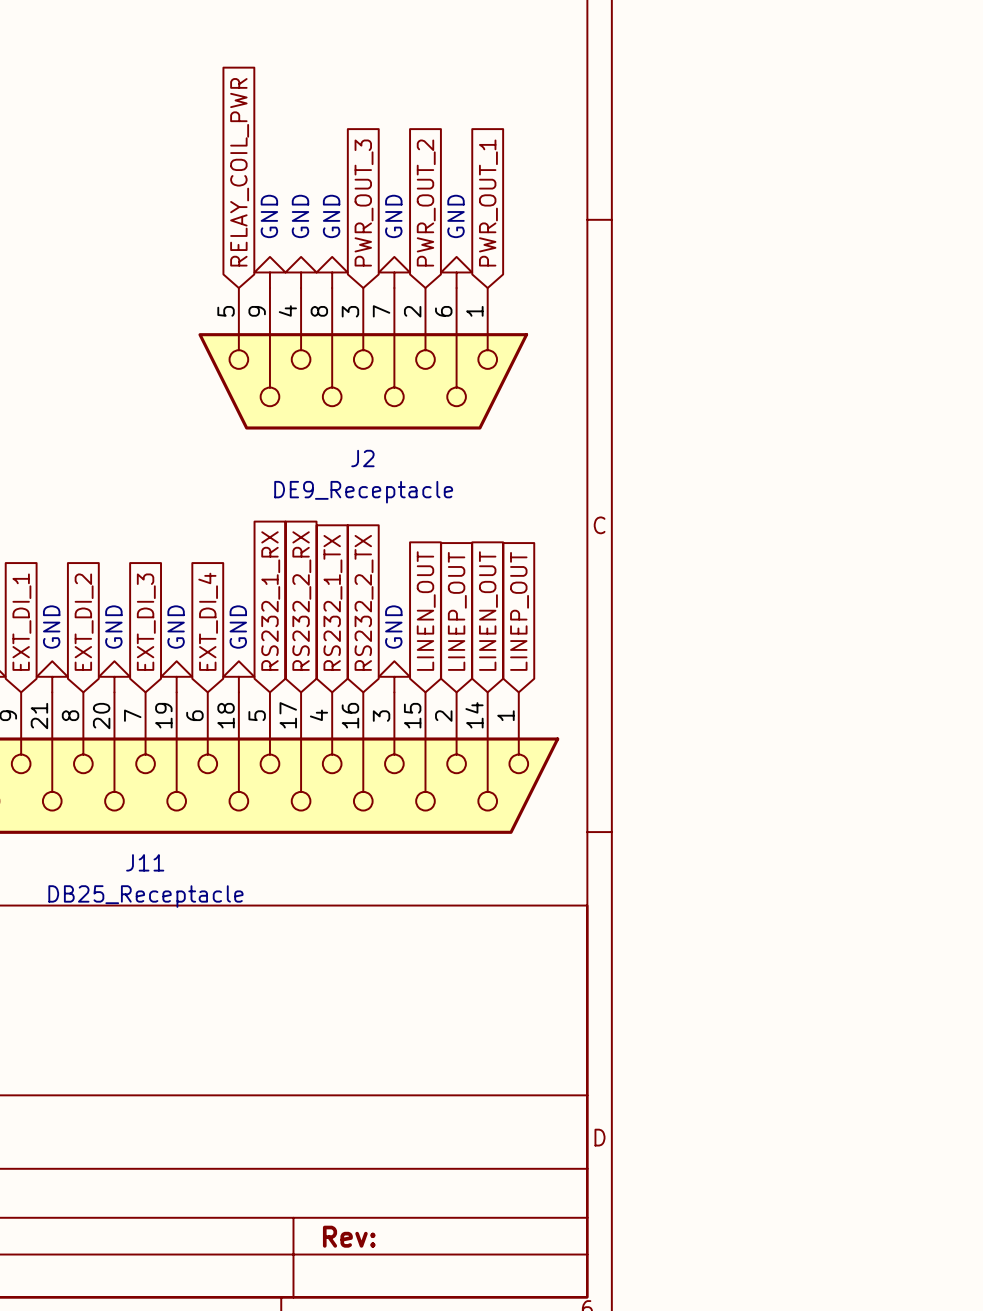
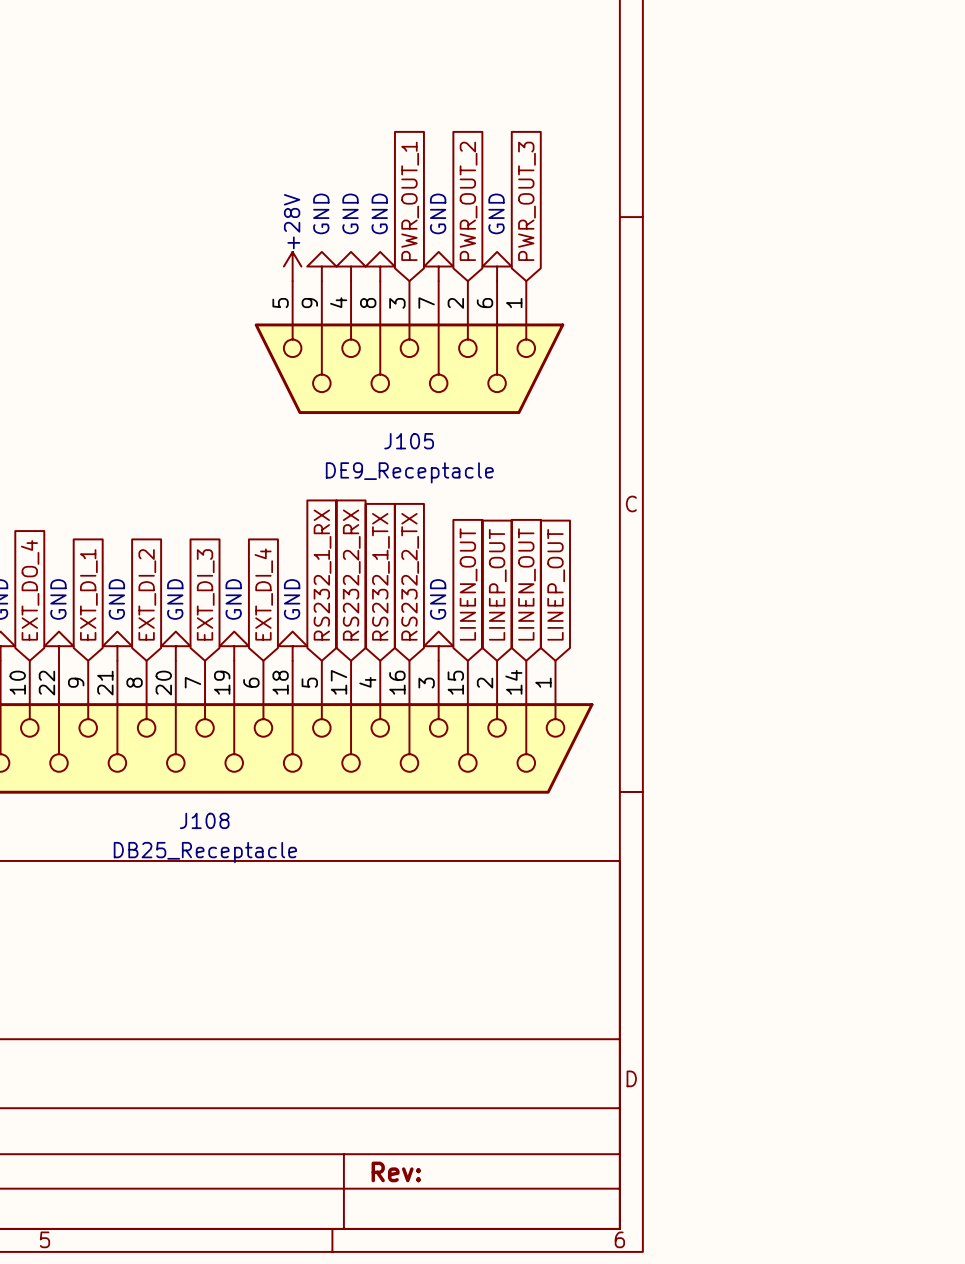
global label: RELAY_COIL_PWR (239, 172) -> none
global label: PWR_OUT_3 (364, 203) -> PWR_OUT_1 (410, 201)
global label: PWR_OUT_1 (488, 203) -> PWR_OUT_3 (526, 201)
power symbol: none -> +28V (292, 266)
J2 name: J2 (362, 458) -> J105 (409, 441)
J11 name: J11 (145, 862) -> J108 (204, 820)

